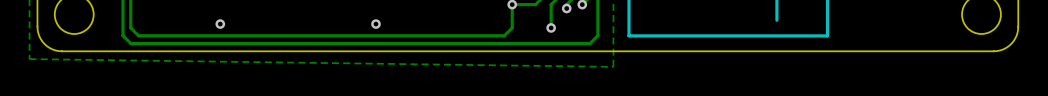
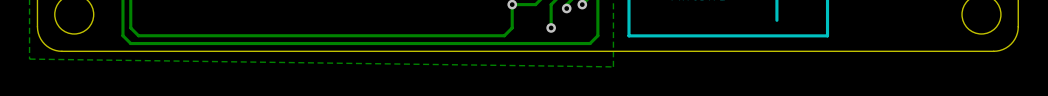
via: (220, 24) -> none
via: (375, 24) -> none

